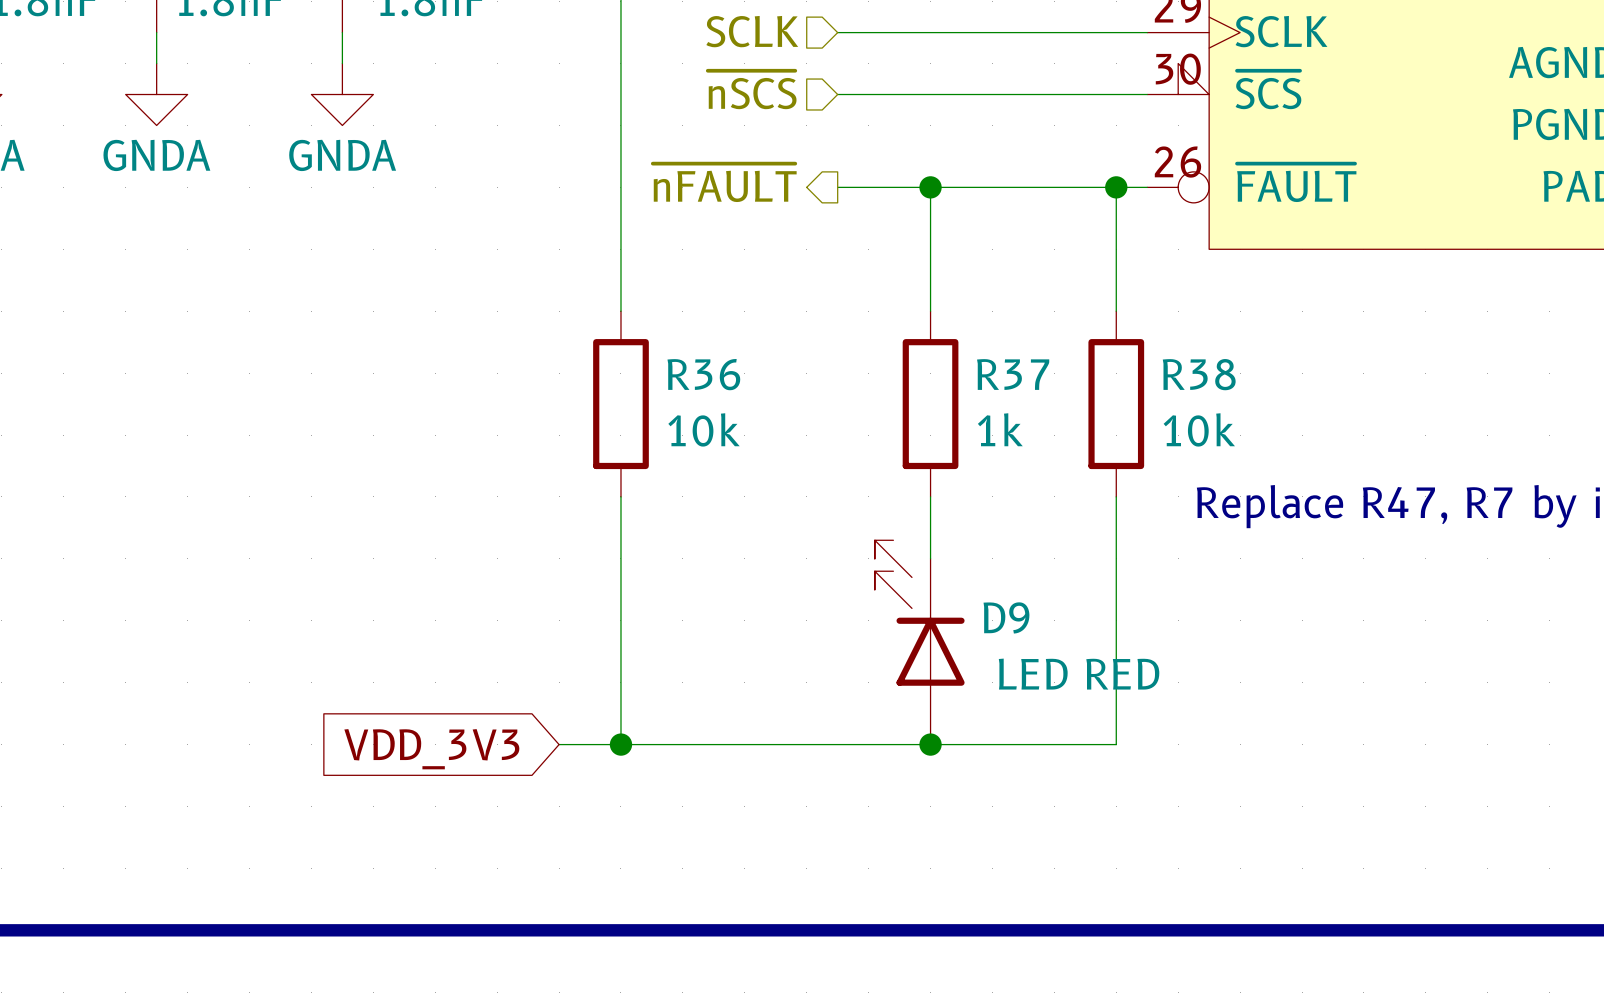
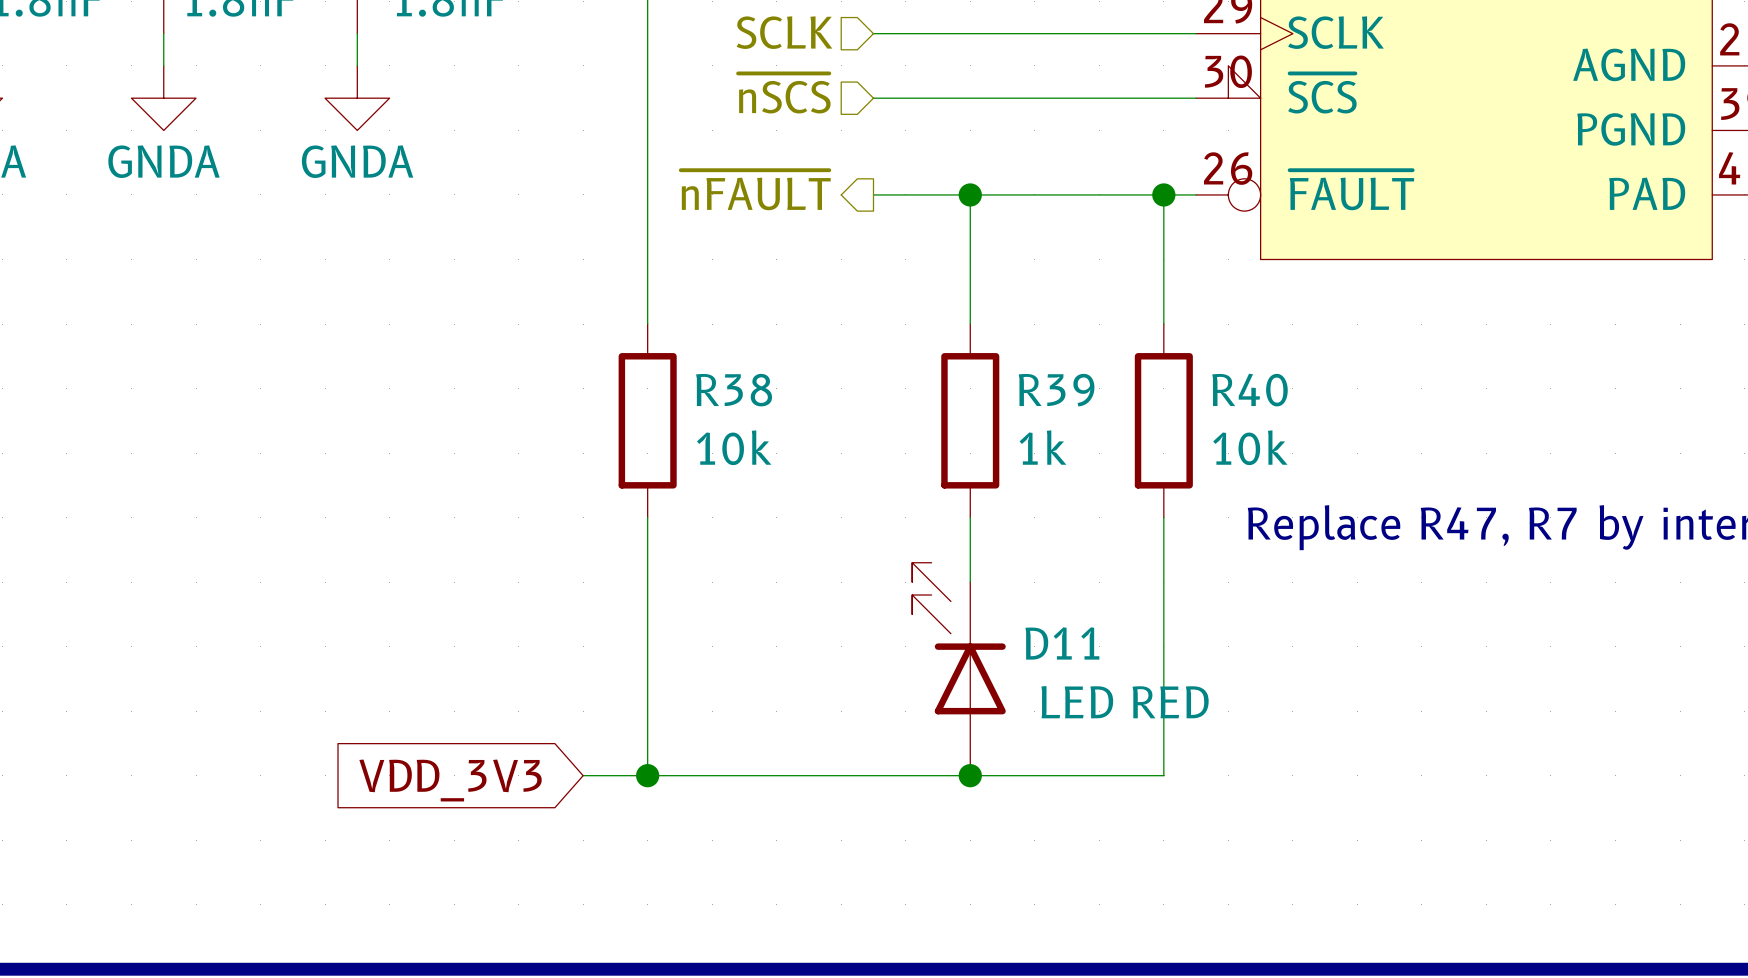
R36 name: R36 (703, 374) -> R38 (734, 390)
R37 name: R37 (1013, 374) -> R39 (1056, 390)
R38 name: R38 (1199, 374) -> R40 (1250, 390)
D9 name: D9 (1006, 617) -> D11 (1062, 643)

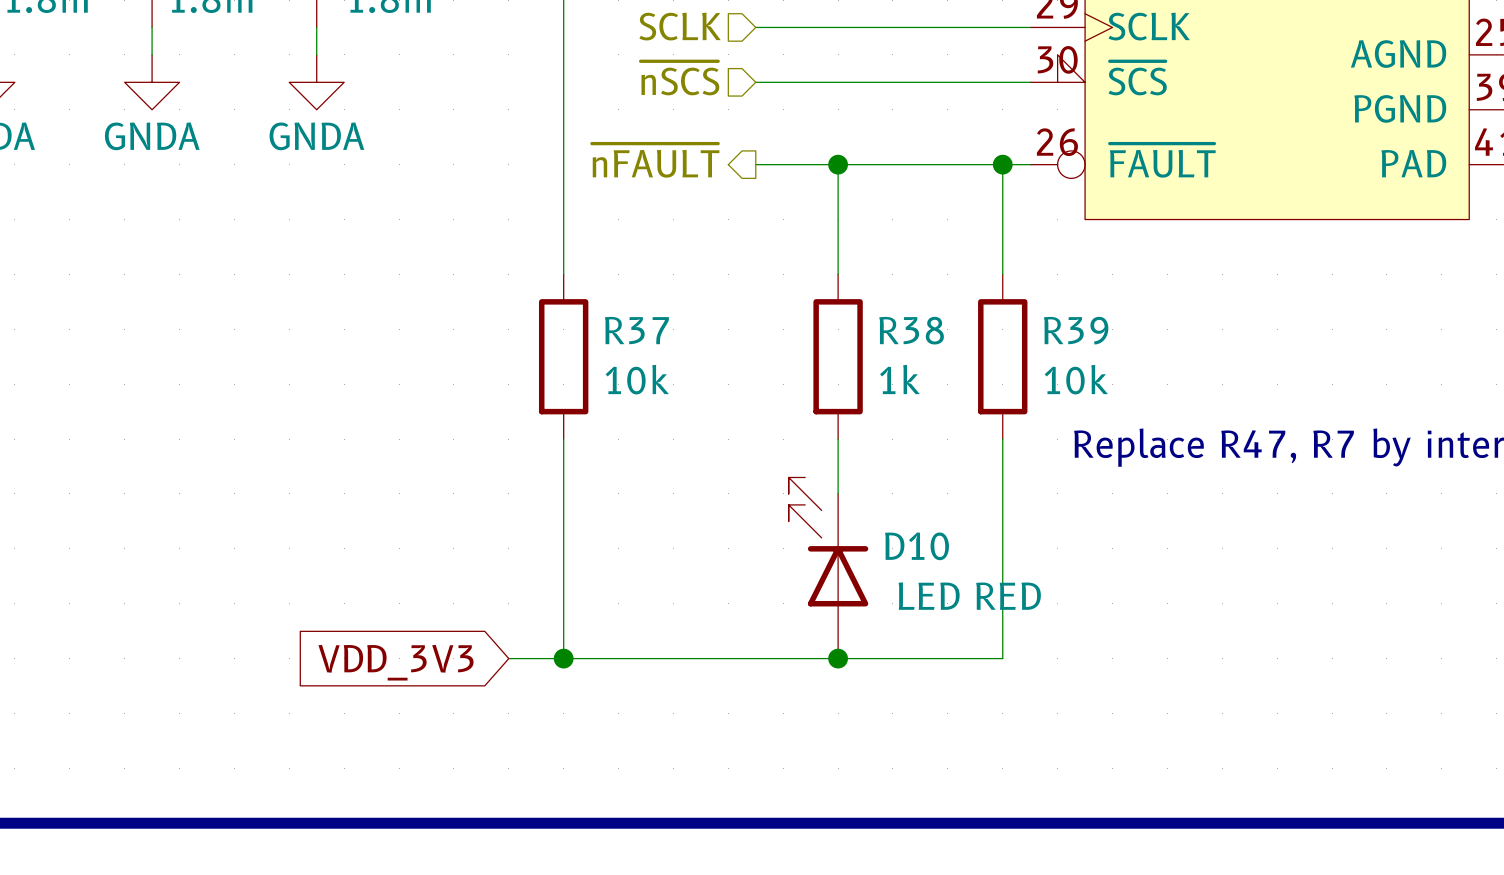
R38 name: R38 (734, 390) -> R37 (636, 330)
R39 name: R39 (1056, 390) -> R38 (911, 330)
R40 name: R40 (1250, 390) -> R39 (1076, 330)
D11 name: D11 (1062, 643) -> D10 (917, 546)

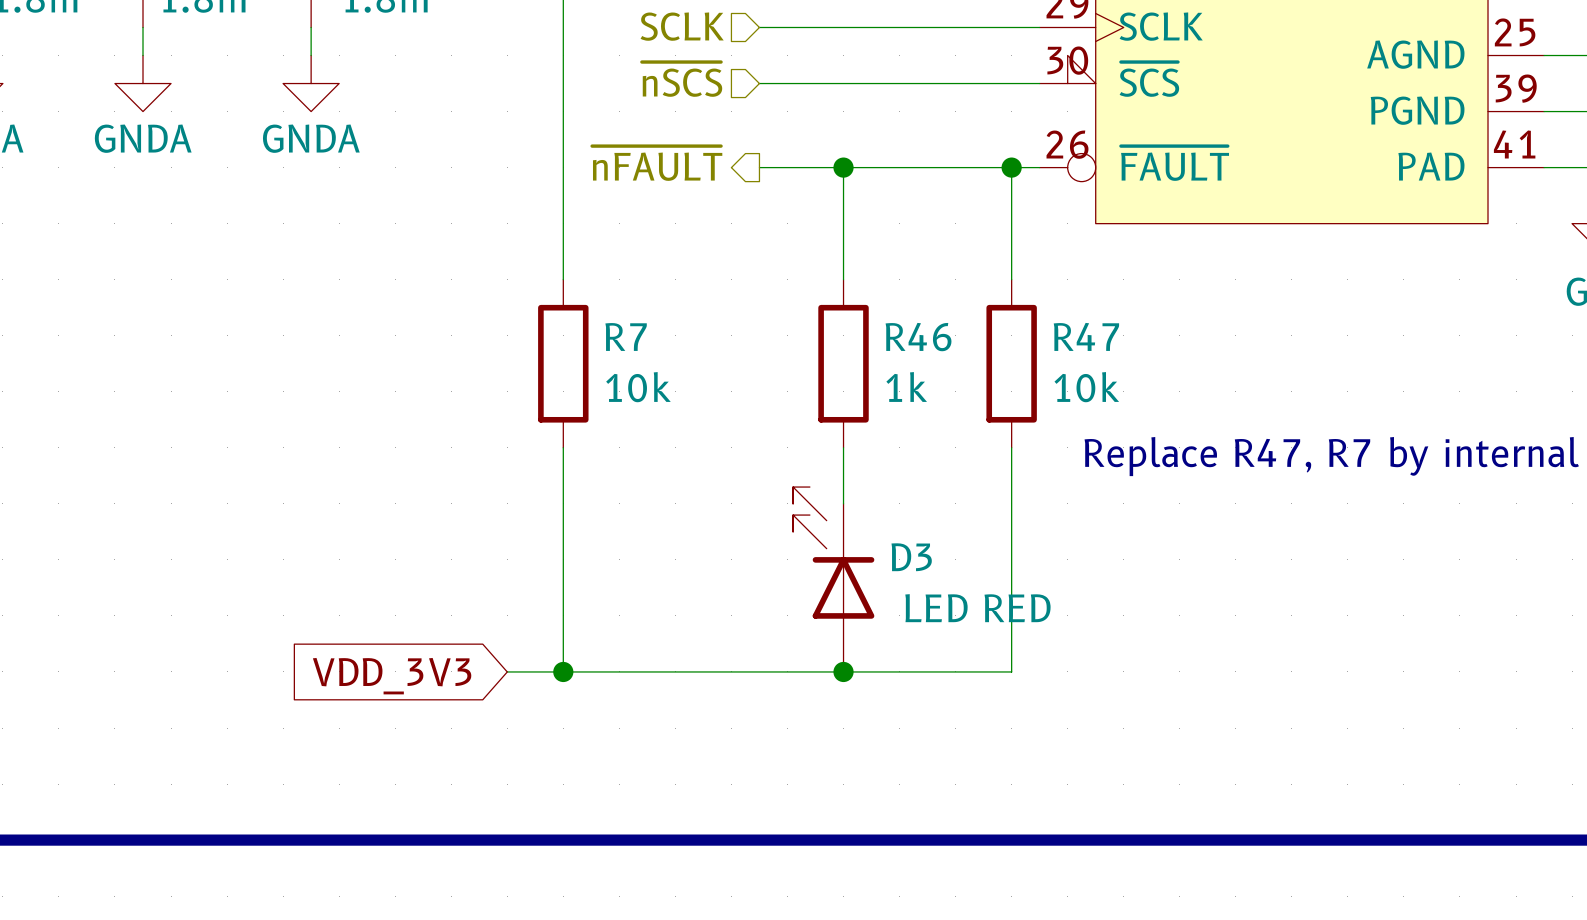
R37 name: R37 (636, 330) -> R7 (626, 336)
R38 name: R38 (911, 330) -> R46 (918, 337)
R39 name: R39 (1076, 330) -> R47 (1086, 336)
D10 name: D10 (917, 546) -> D3 (911, 557)

